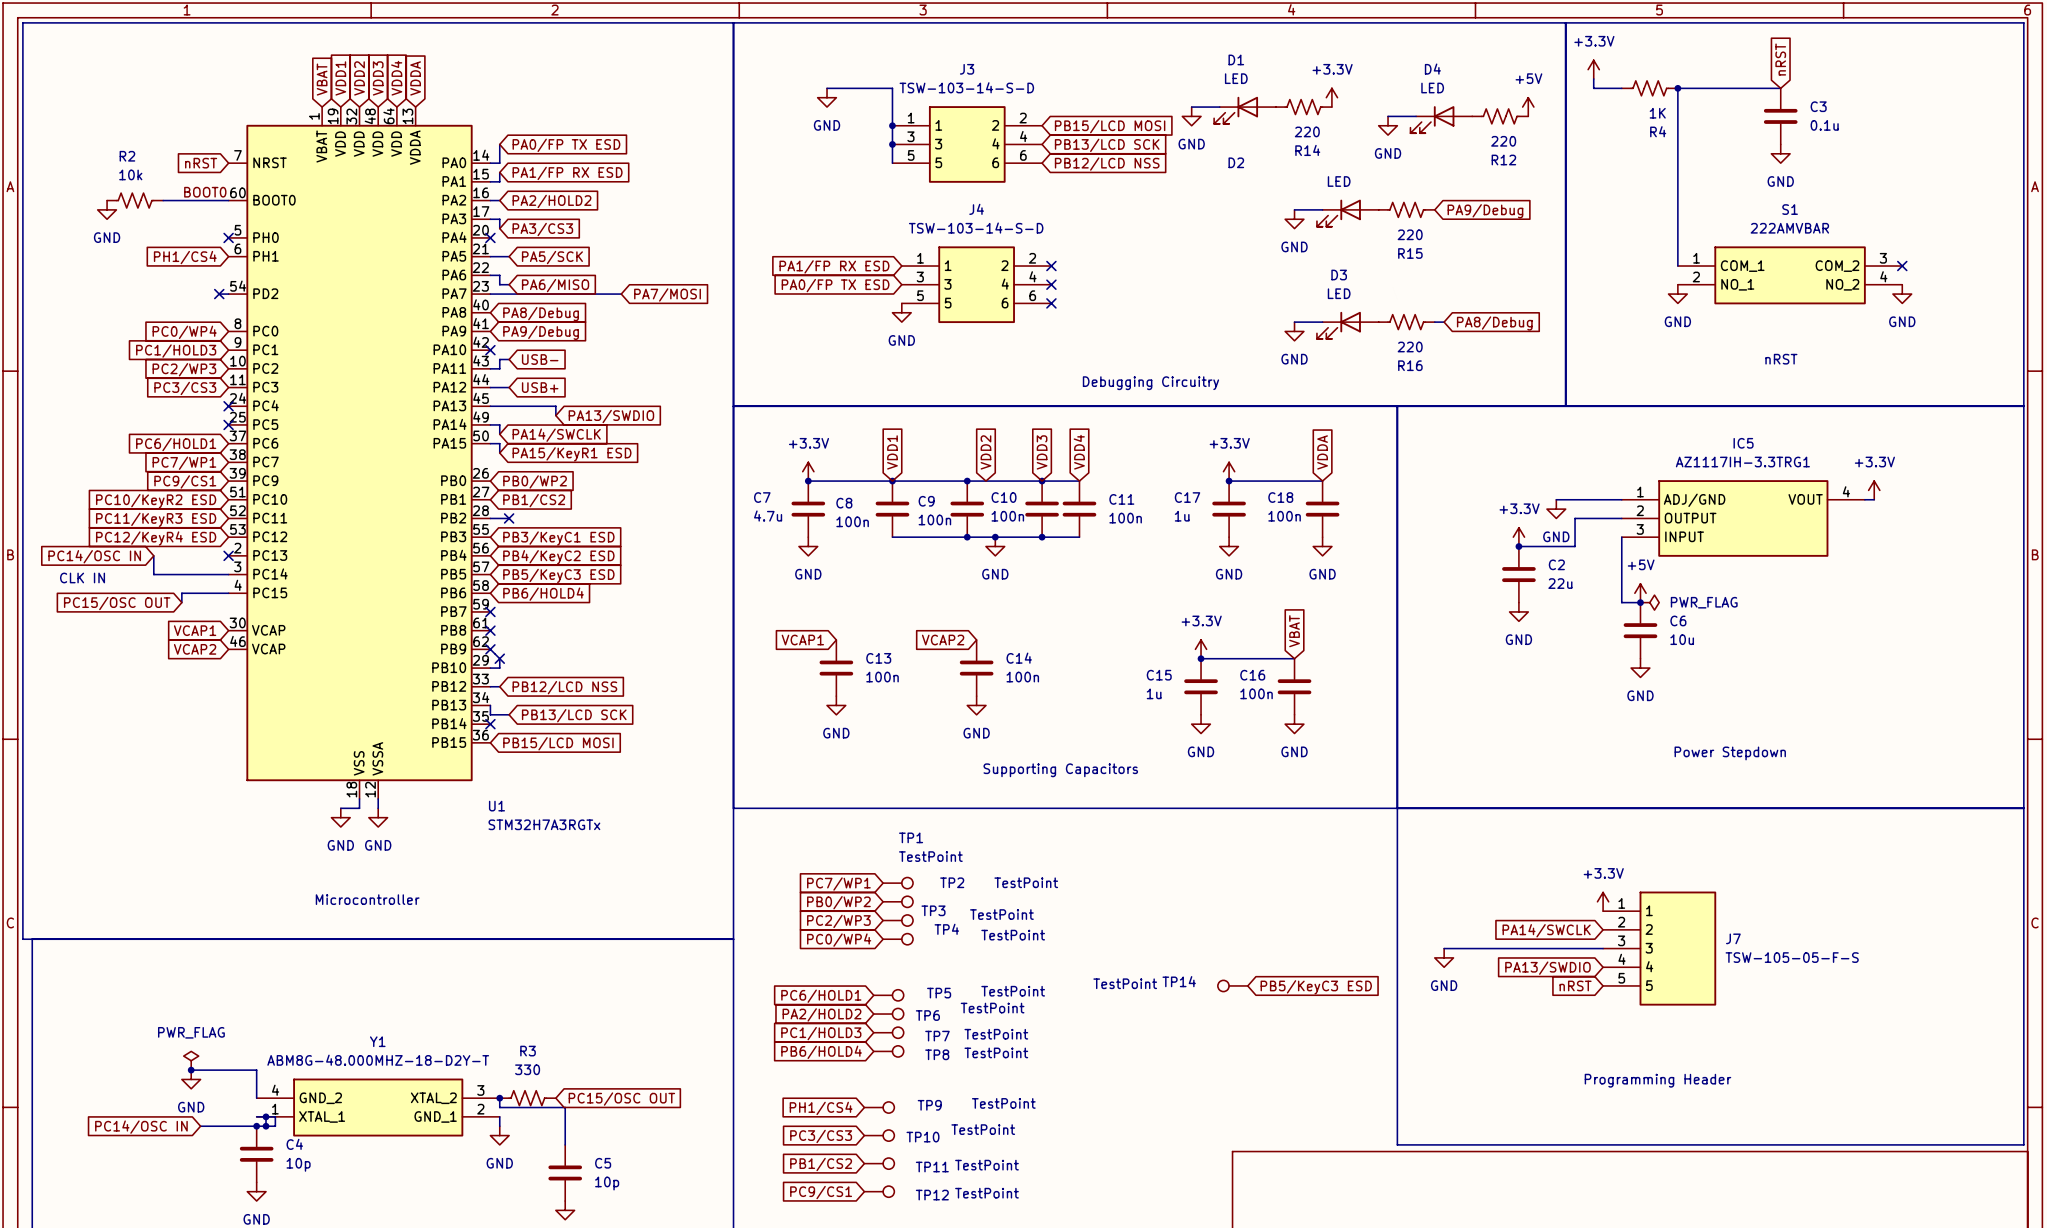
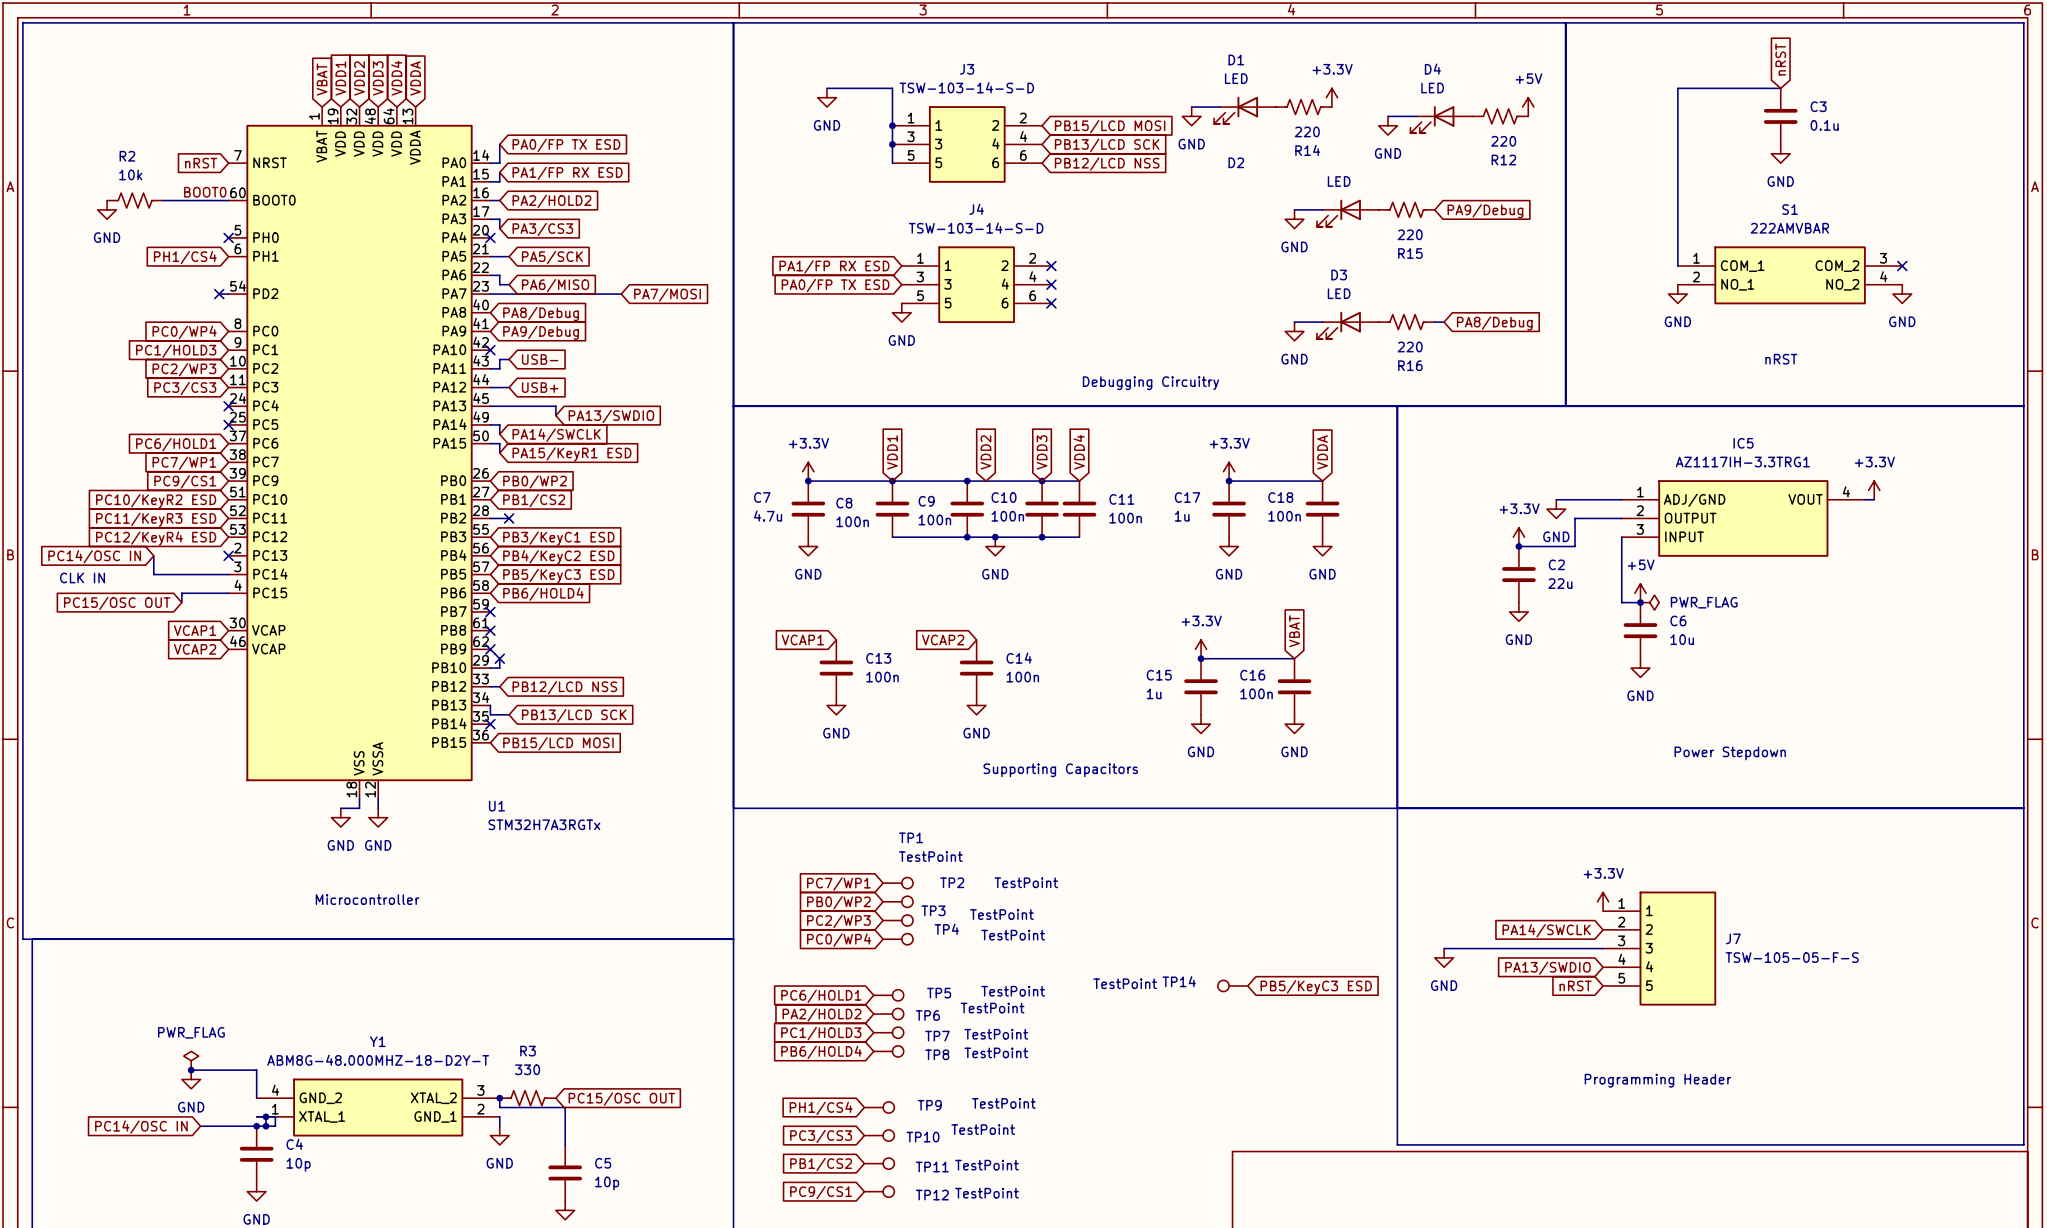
power symbol: +3.3V (1593, 69) -> none
wire: (1593, 79) (1593, 88) (1621, 88) -> none
R4: 1K (1649, 88) -> none
junction: (1677, 88) -> none

